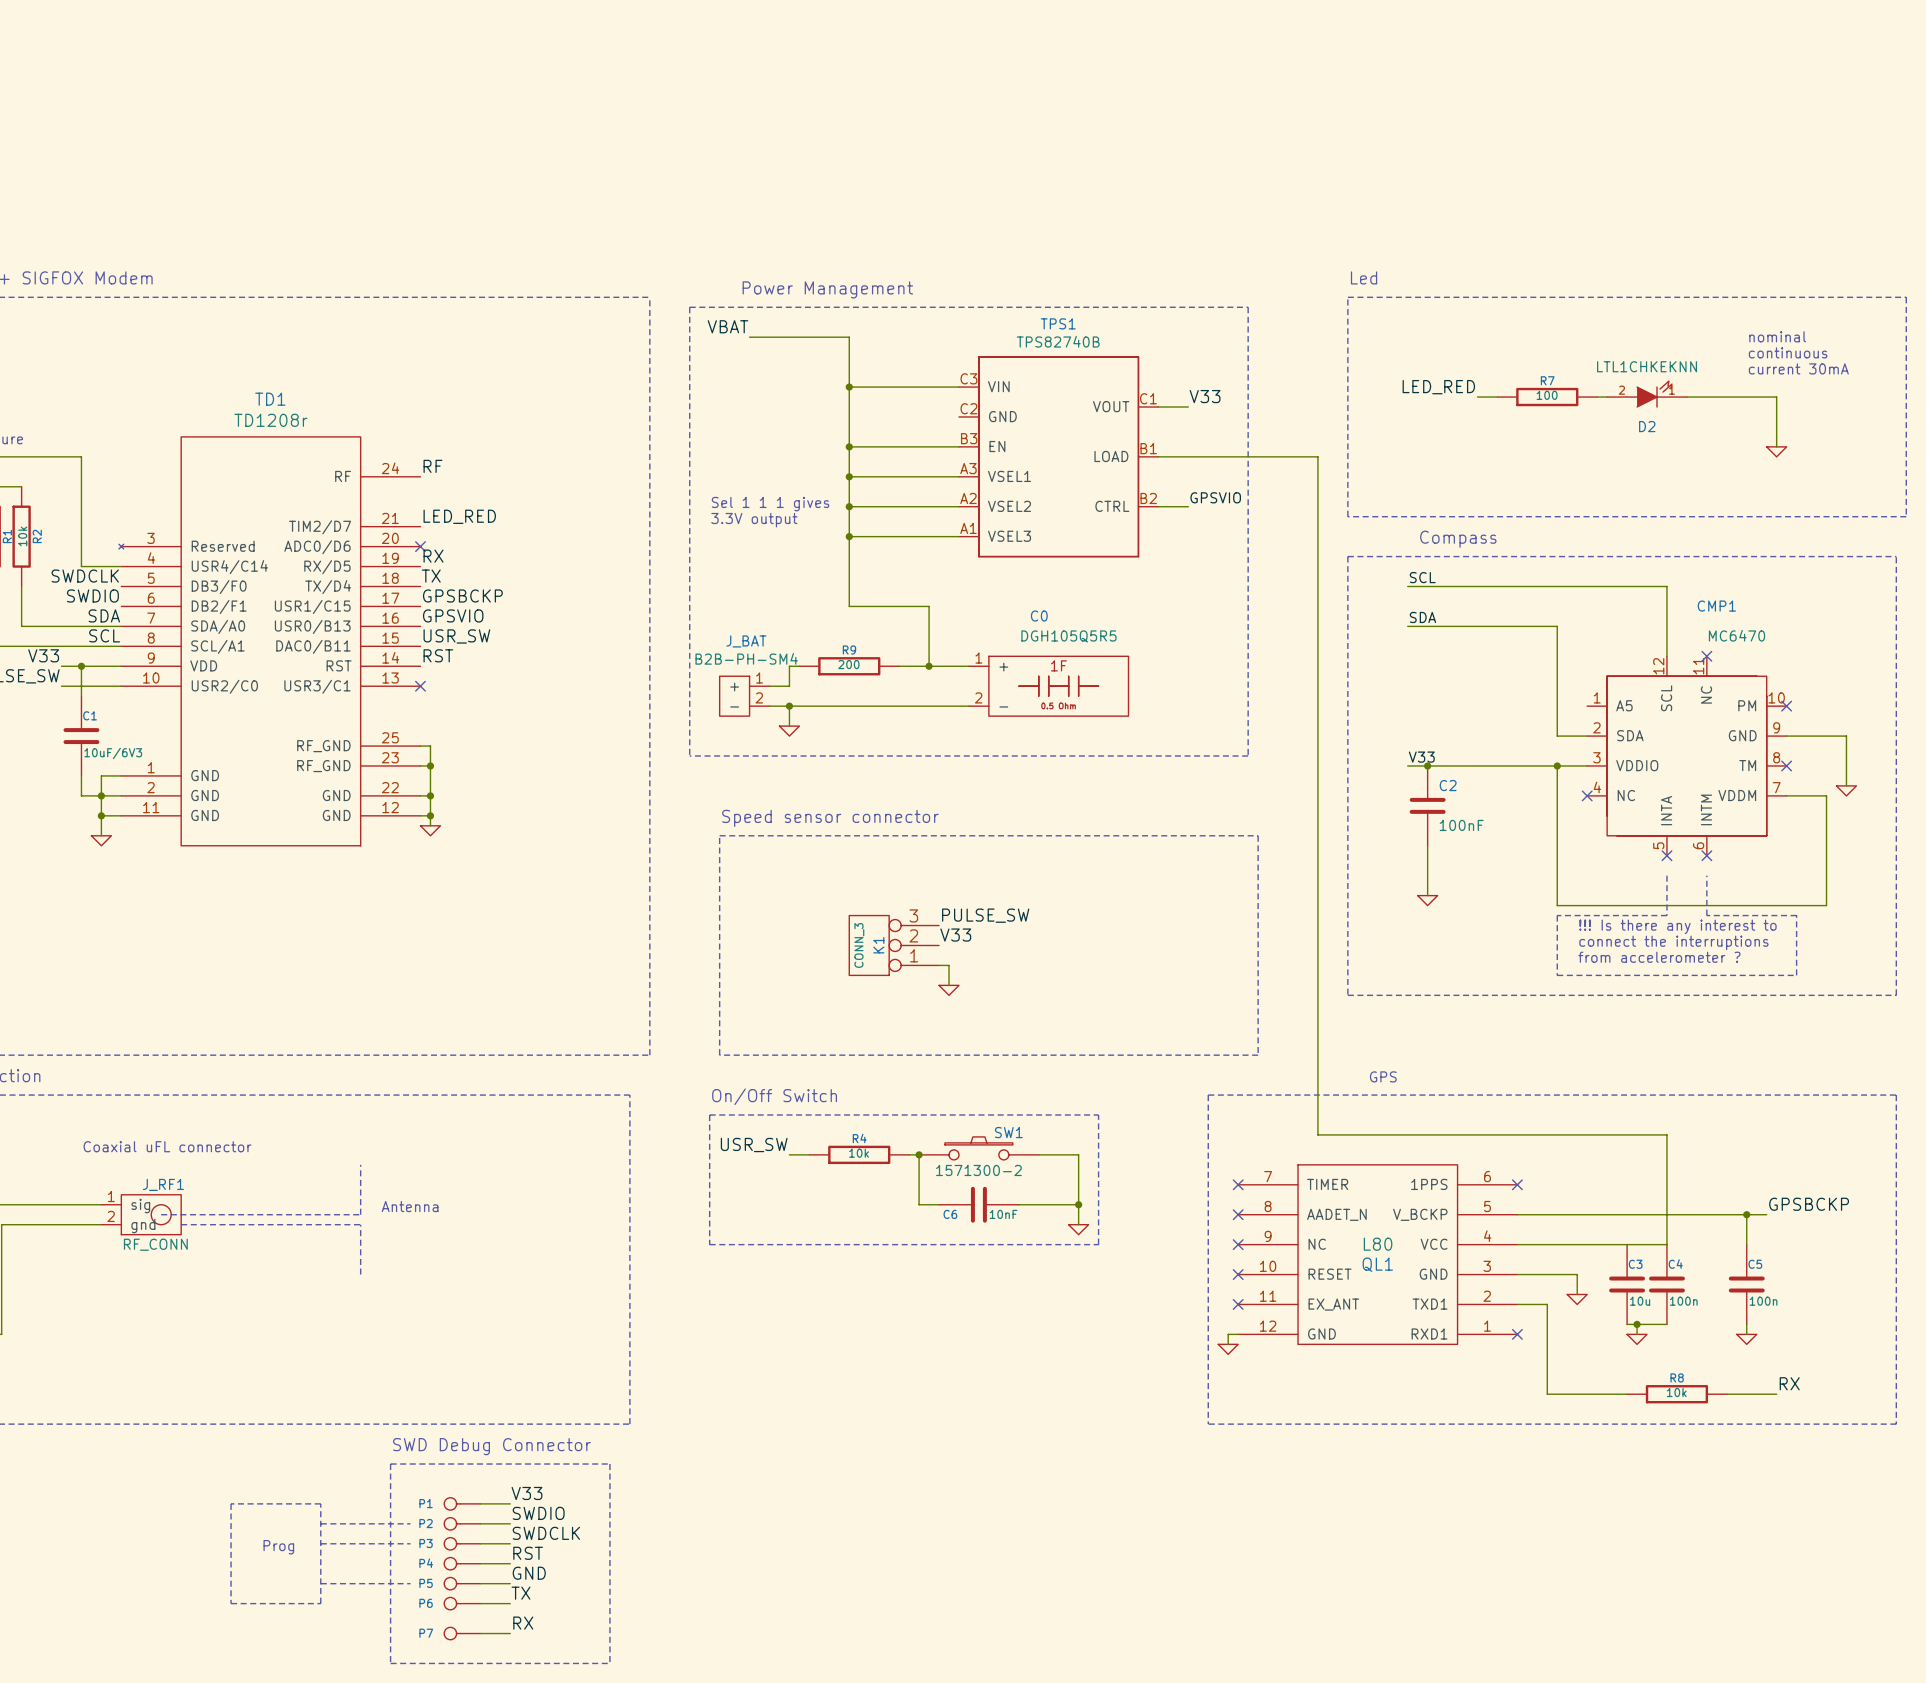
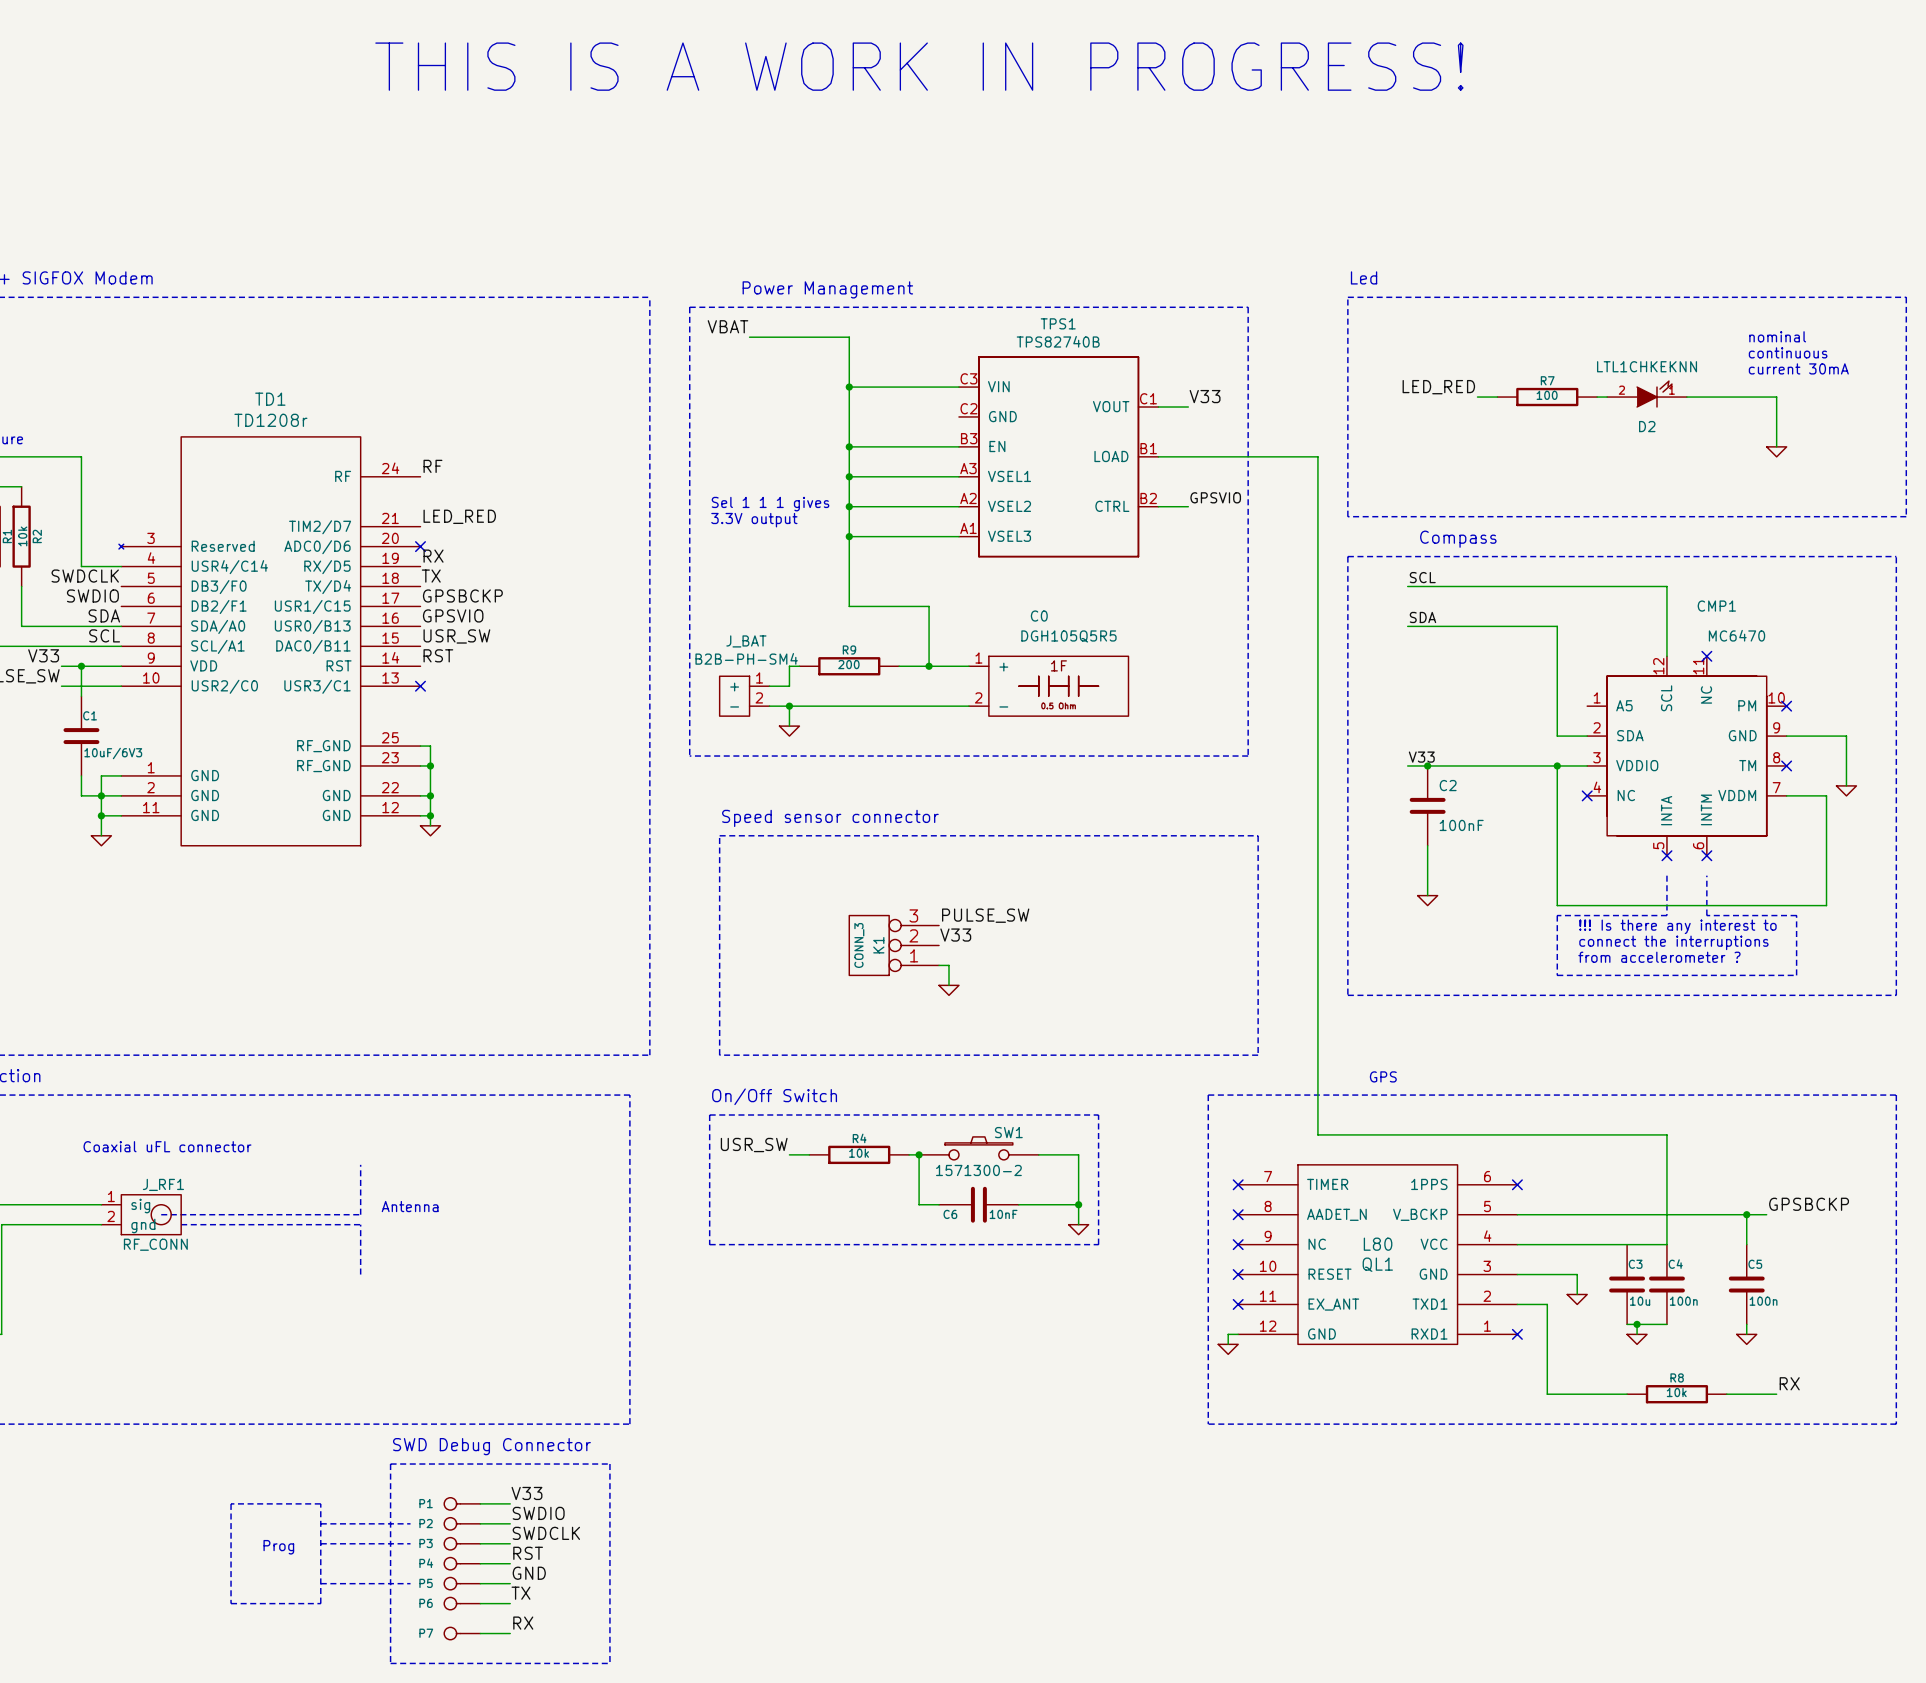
text: none -> THIS IS A WORK IN PROGRESS! (919, 66)

